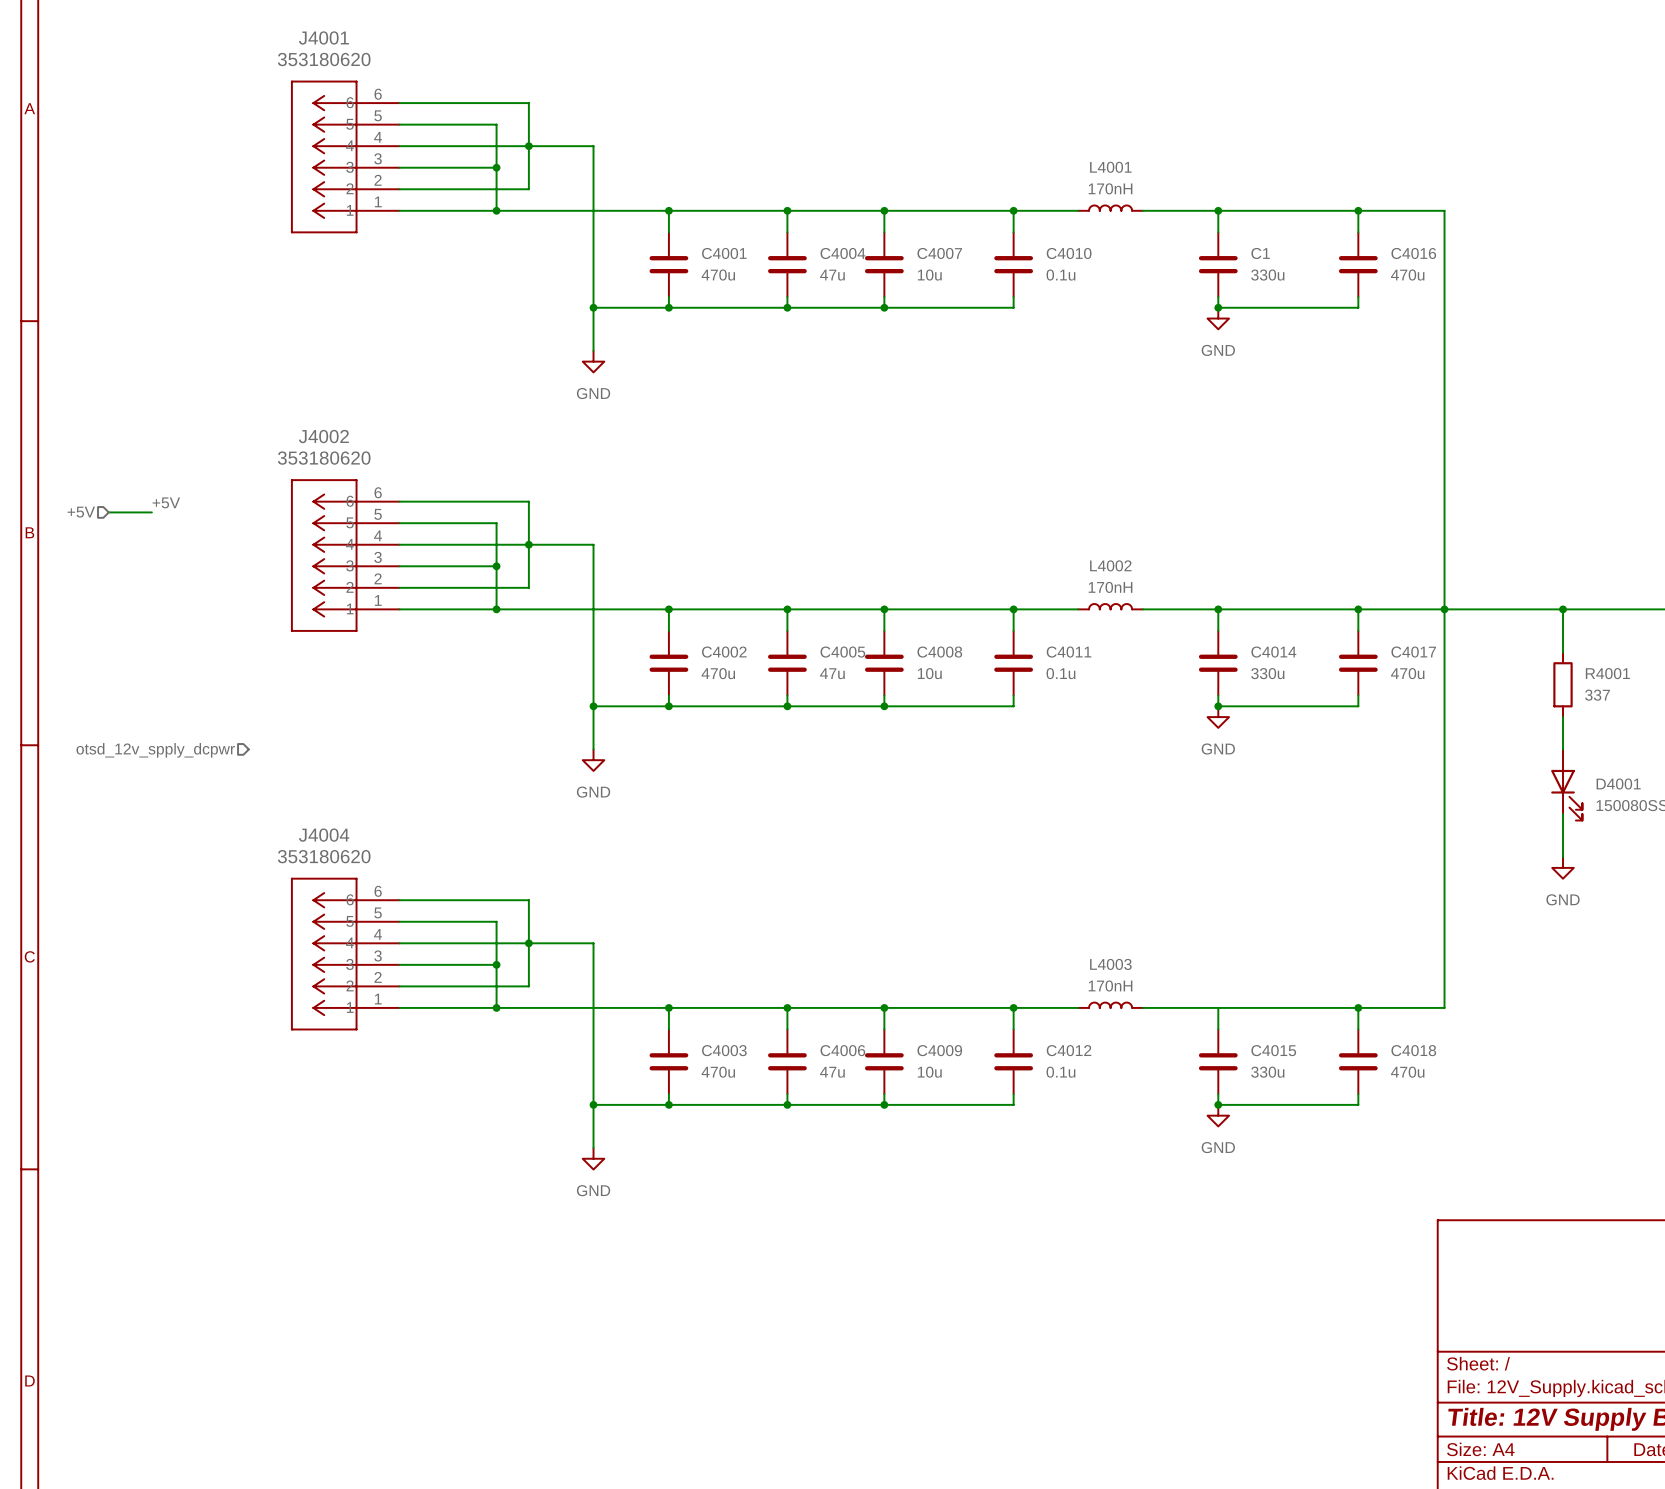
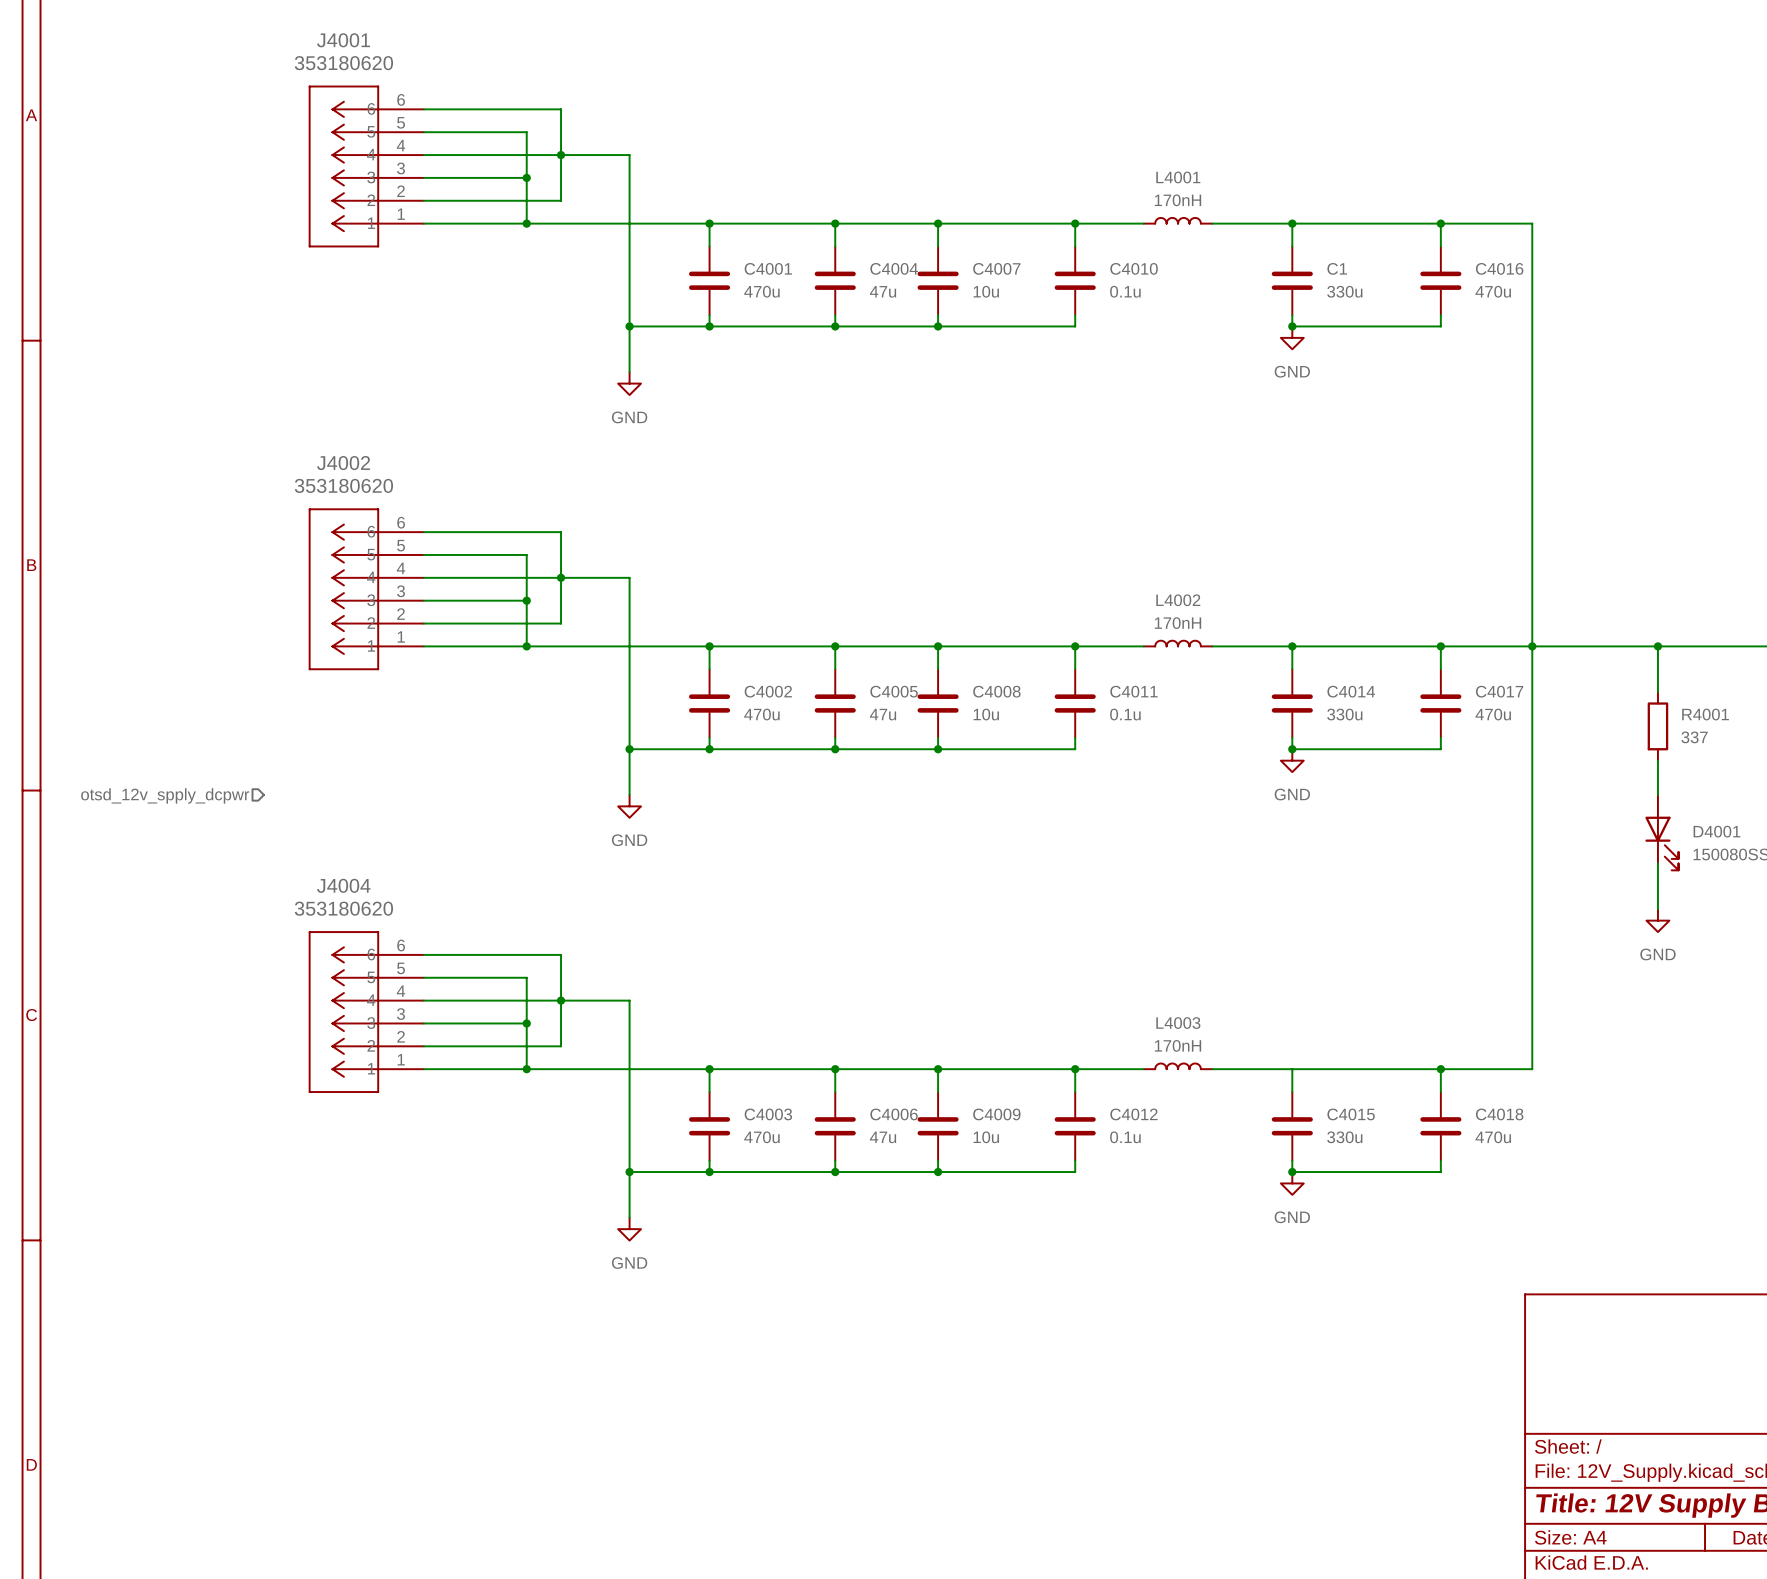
label: +5V (166, 502) -> none
hierarchical label: +5V (81, 512) -> none
wire: (108, 512) (151, 512) -> none

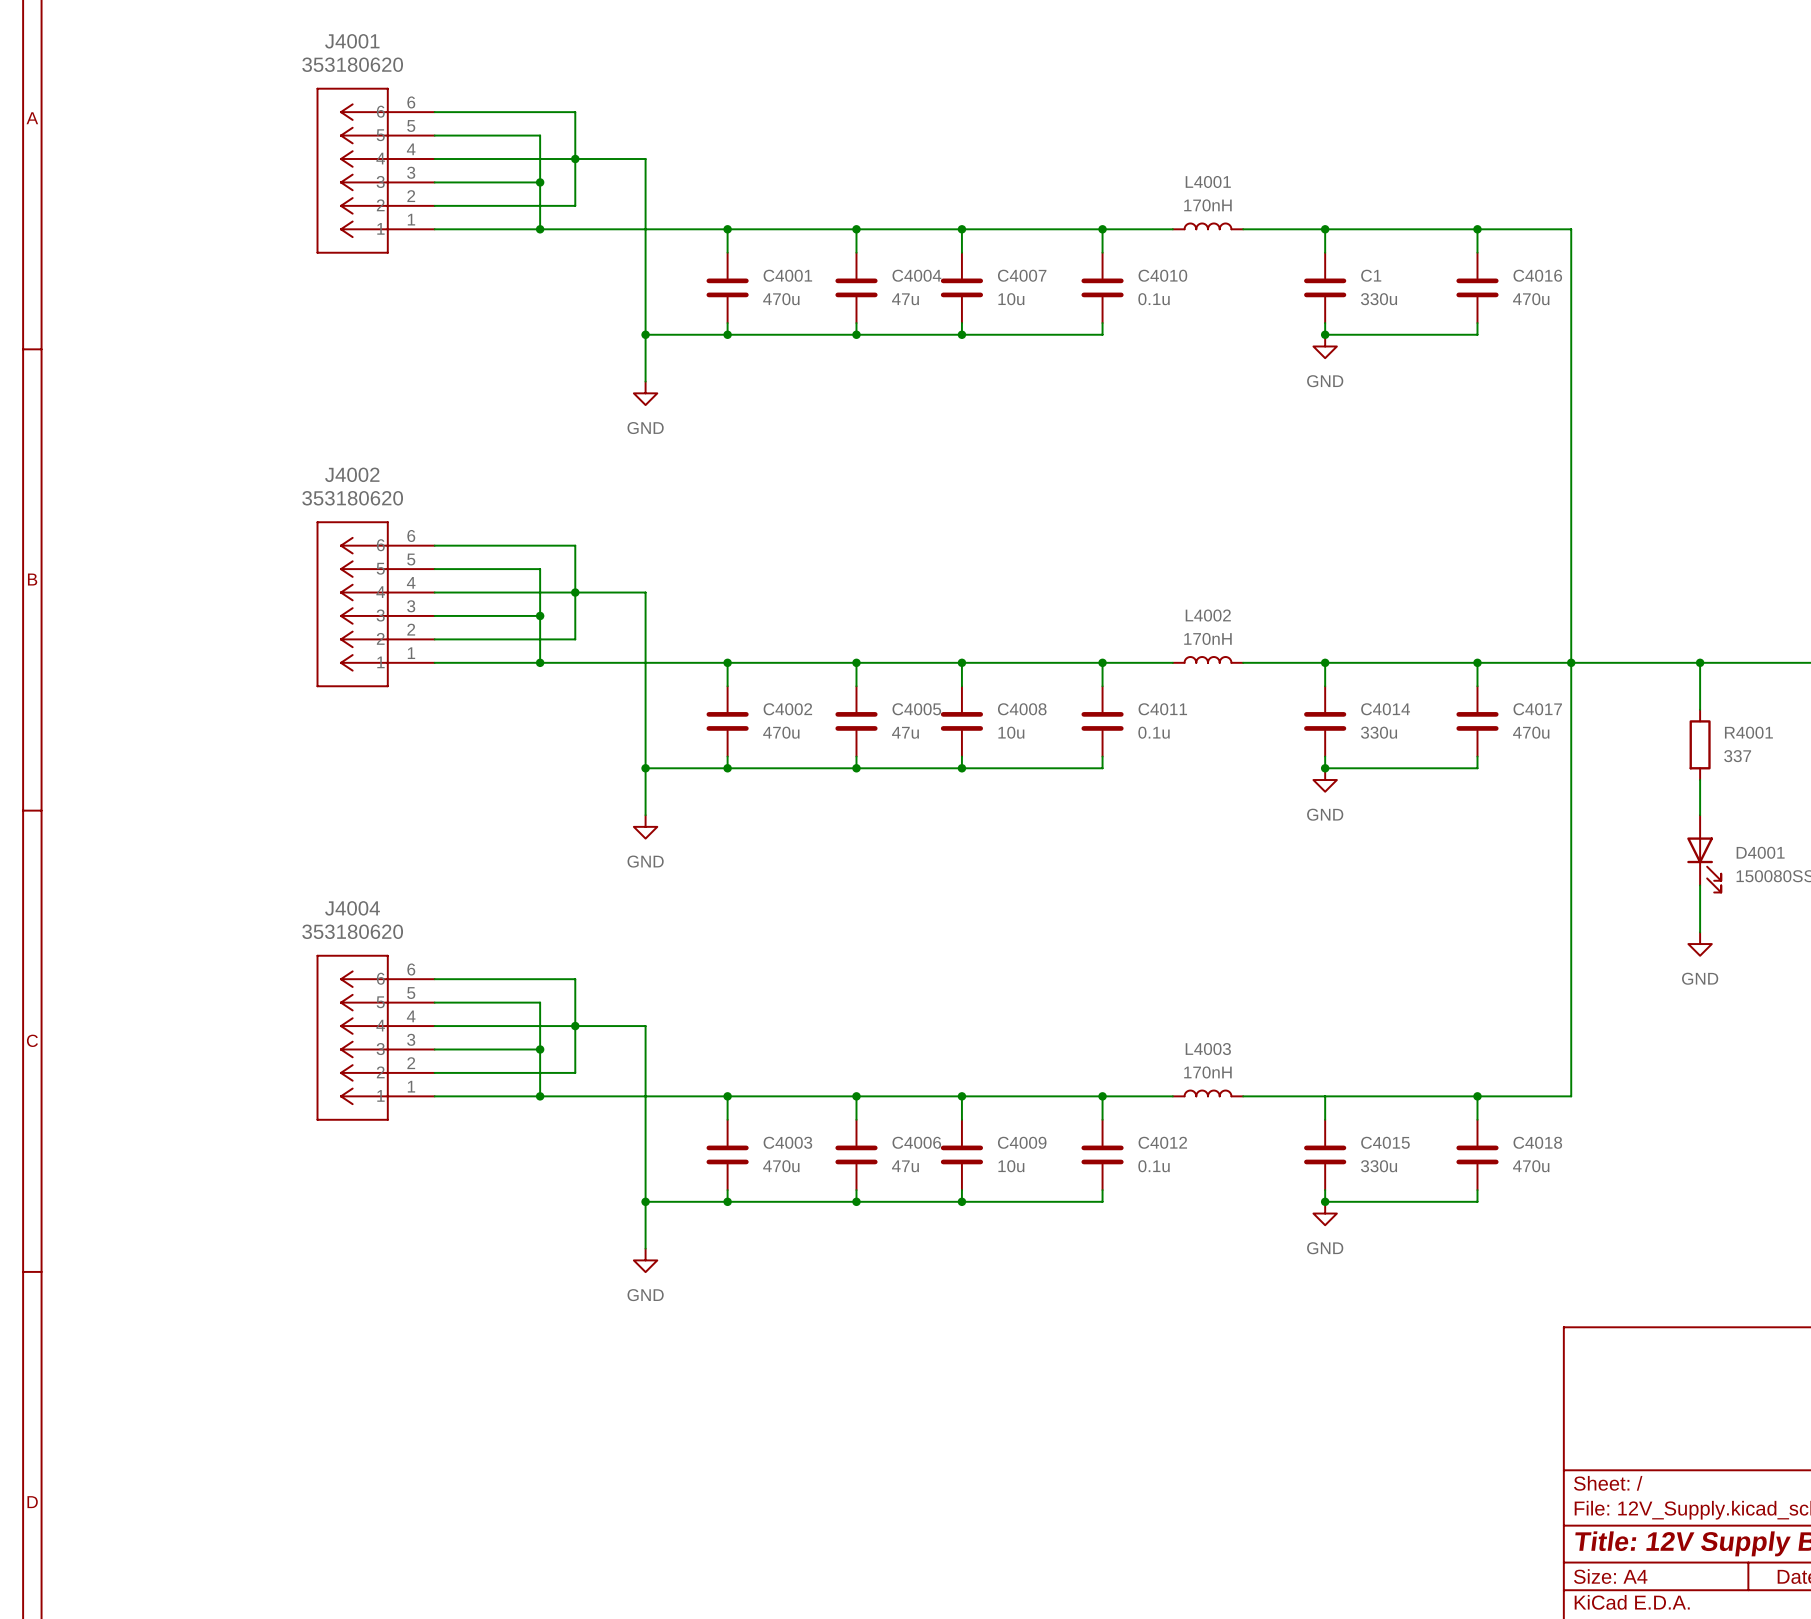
hierarchical label: otsd_12v_spply_dcpwr (165, 795) -> none

